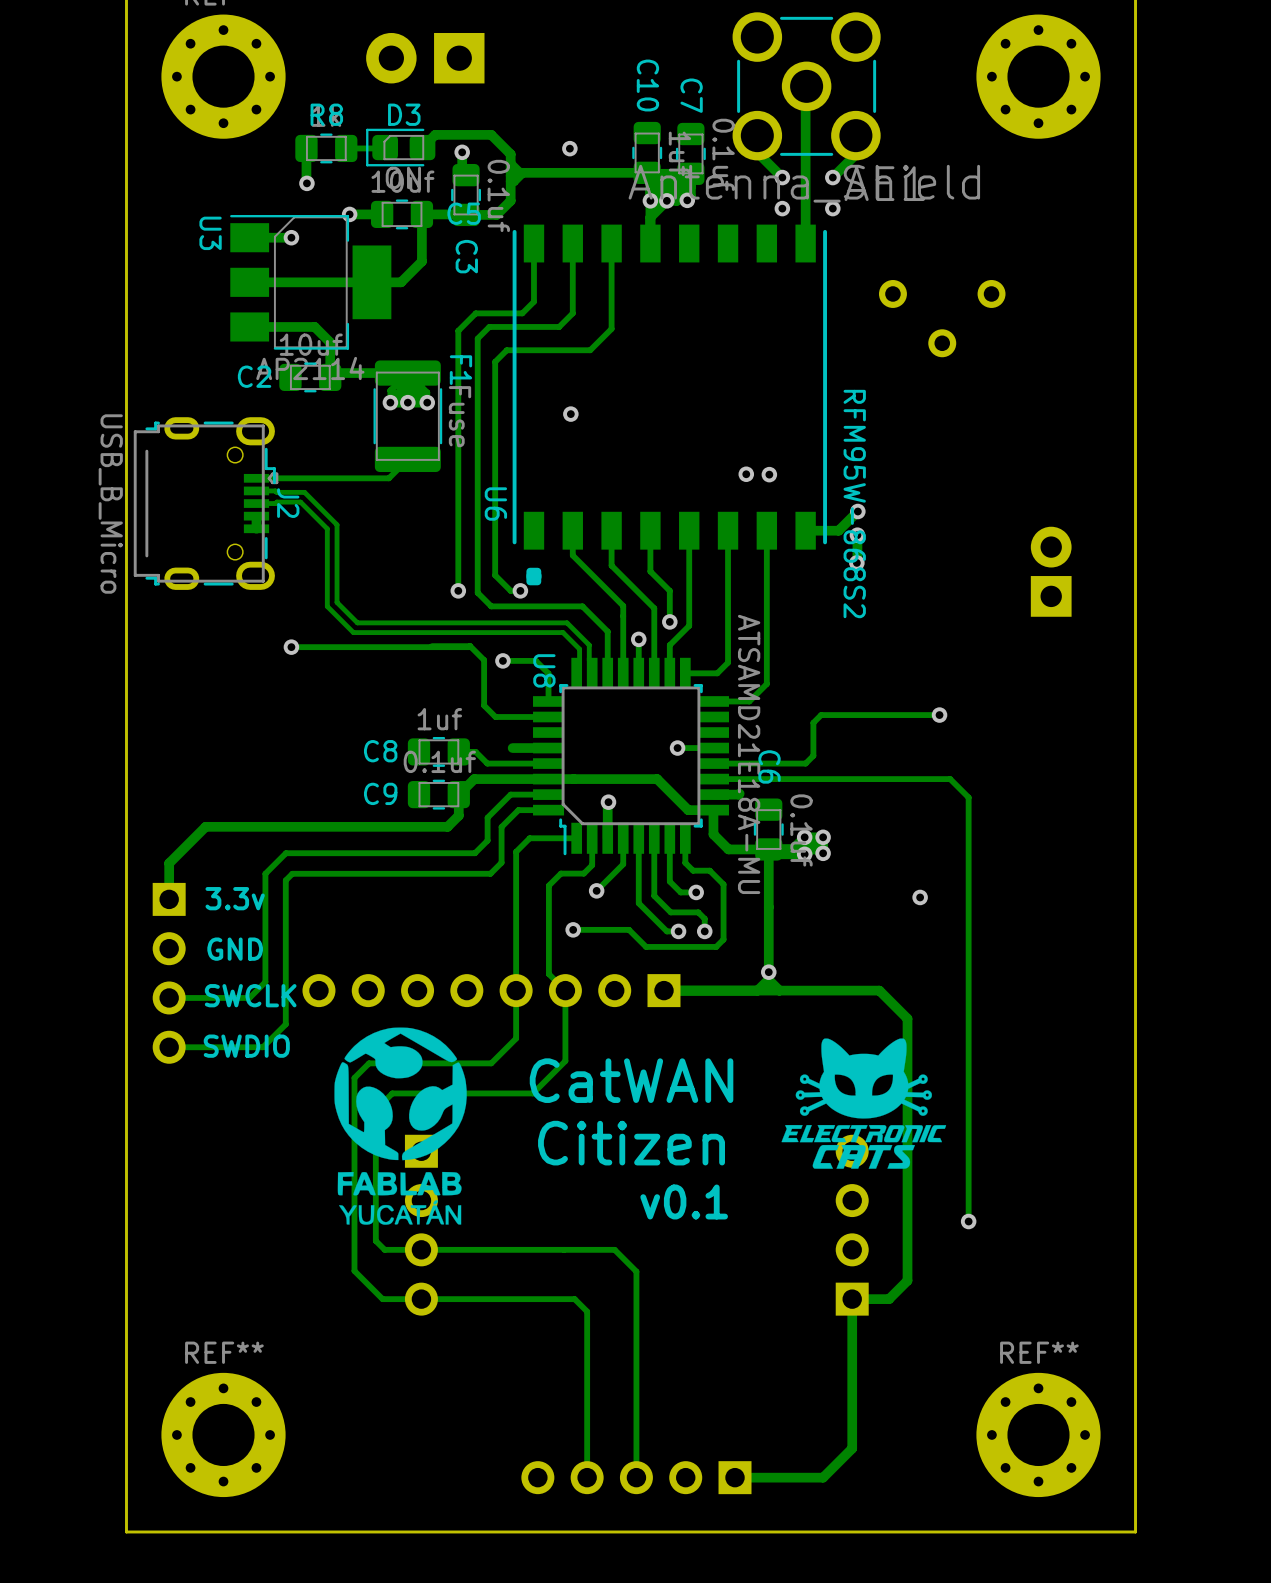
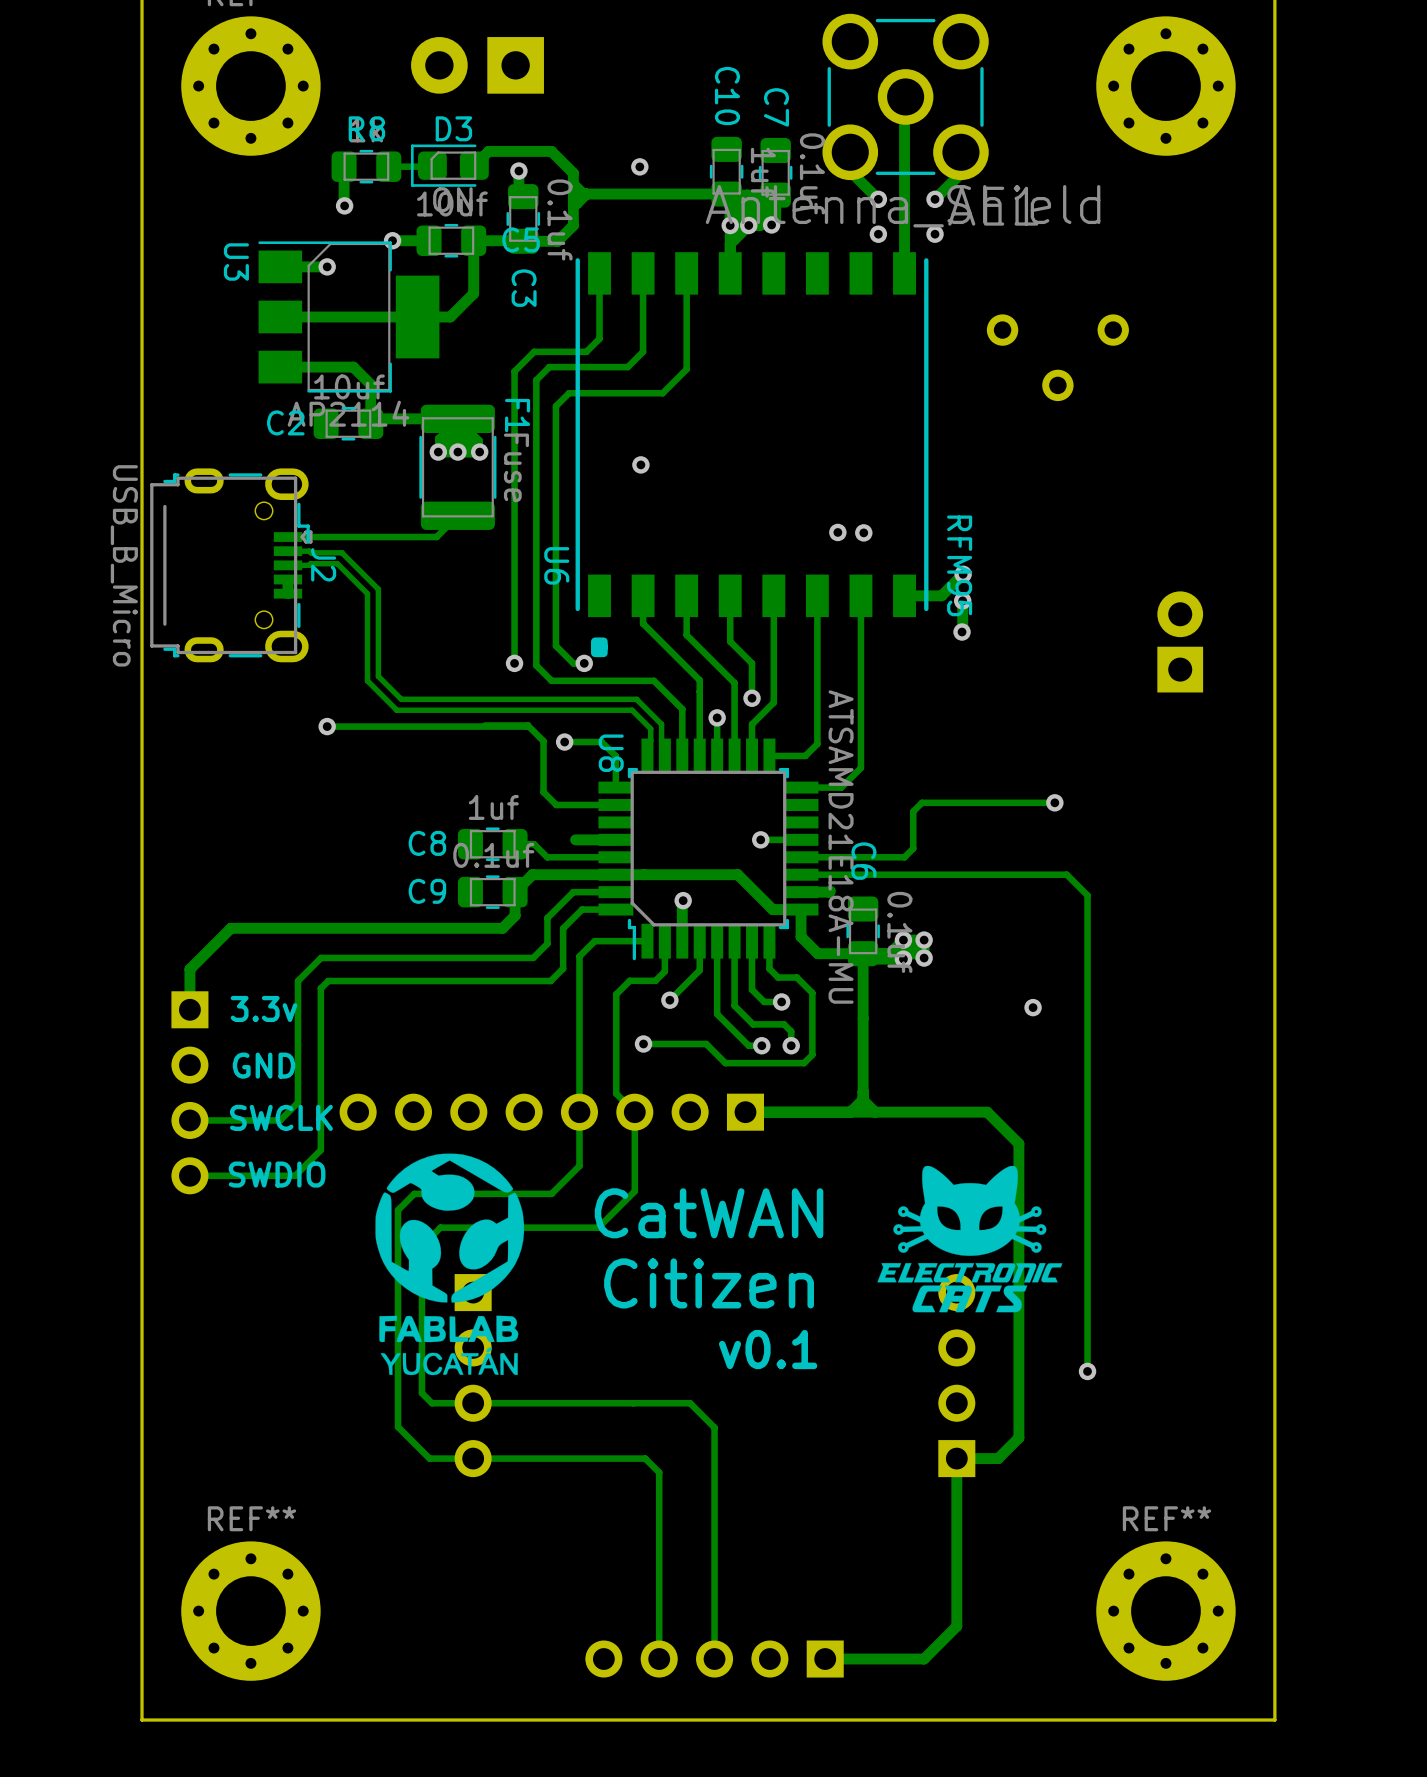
U6 value: RFM95W-868S2 (854, 504) -> RFM95 (959, 565)
via: (768, 972) -> none

